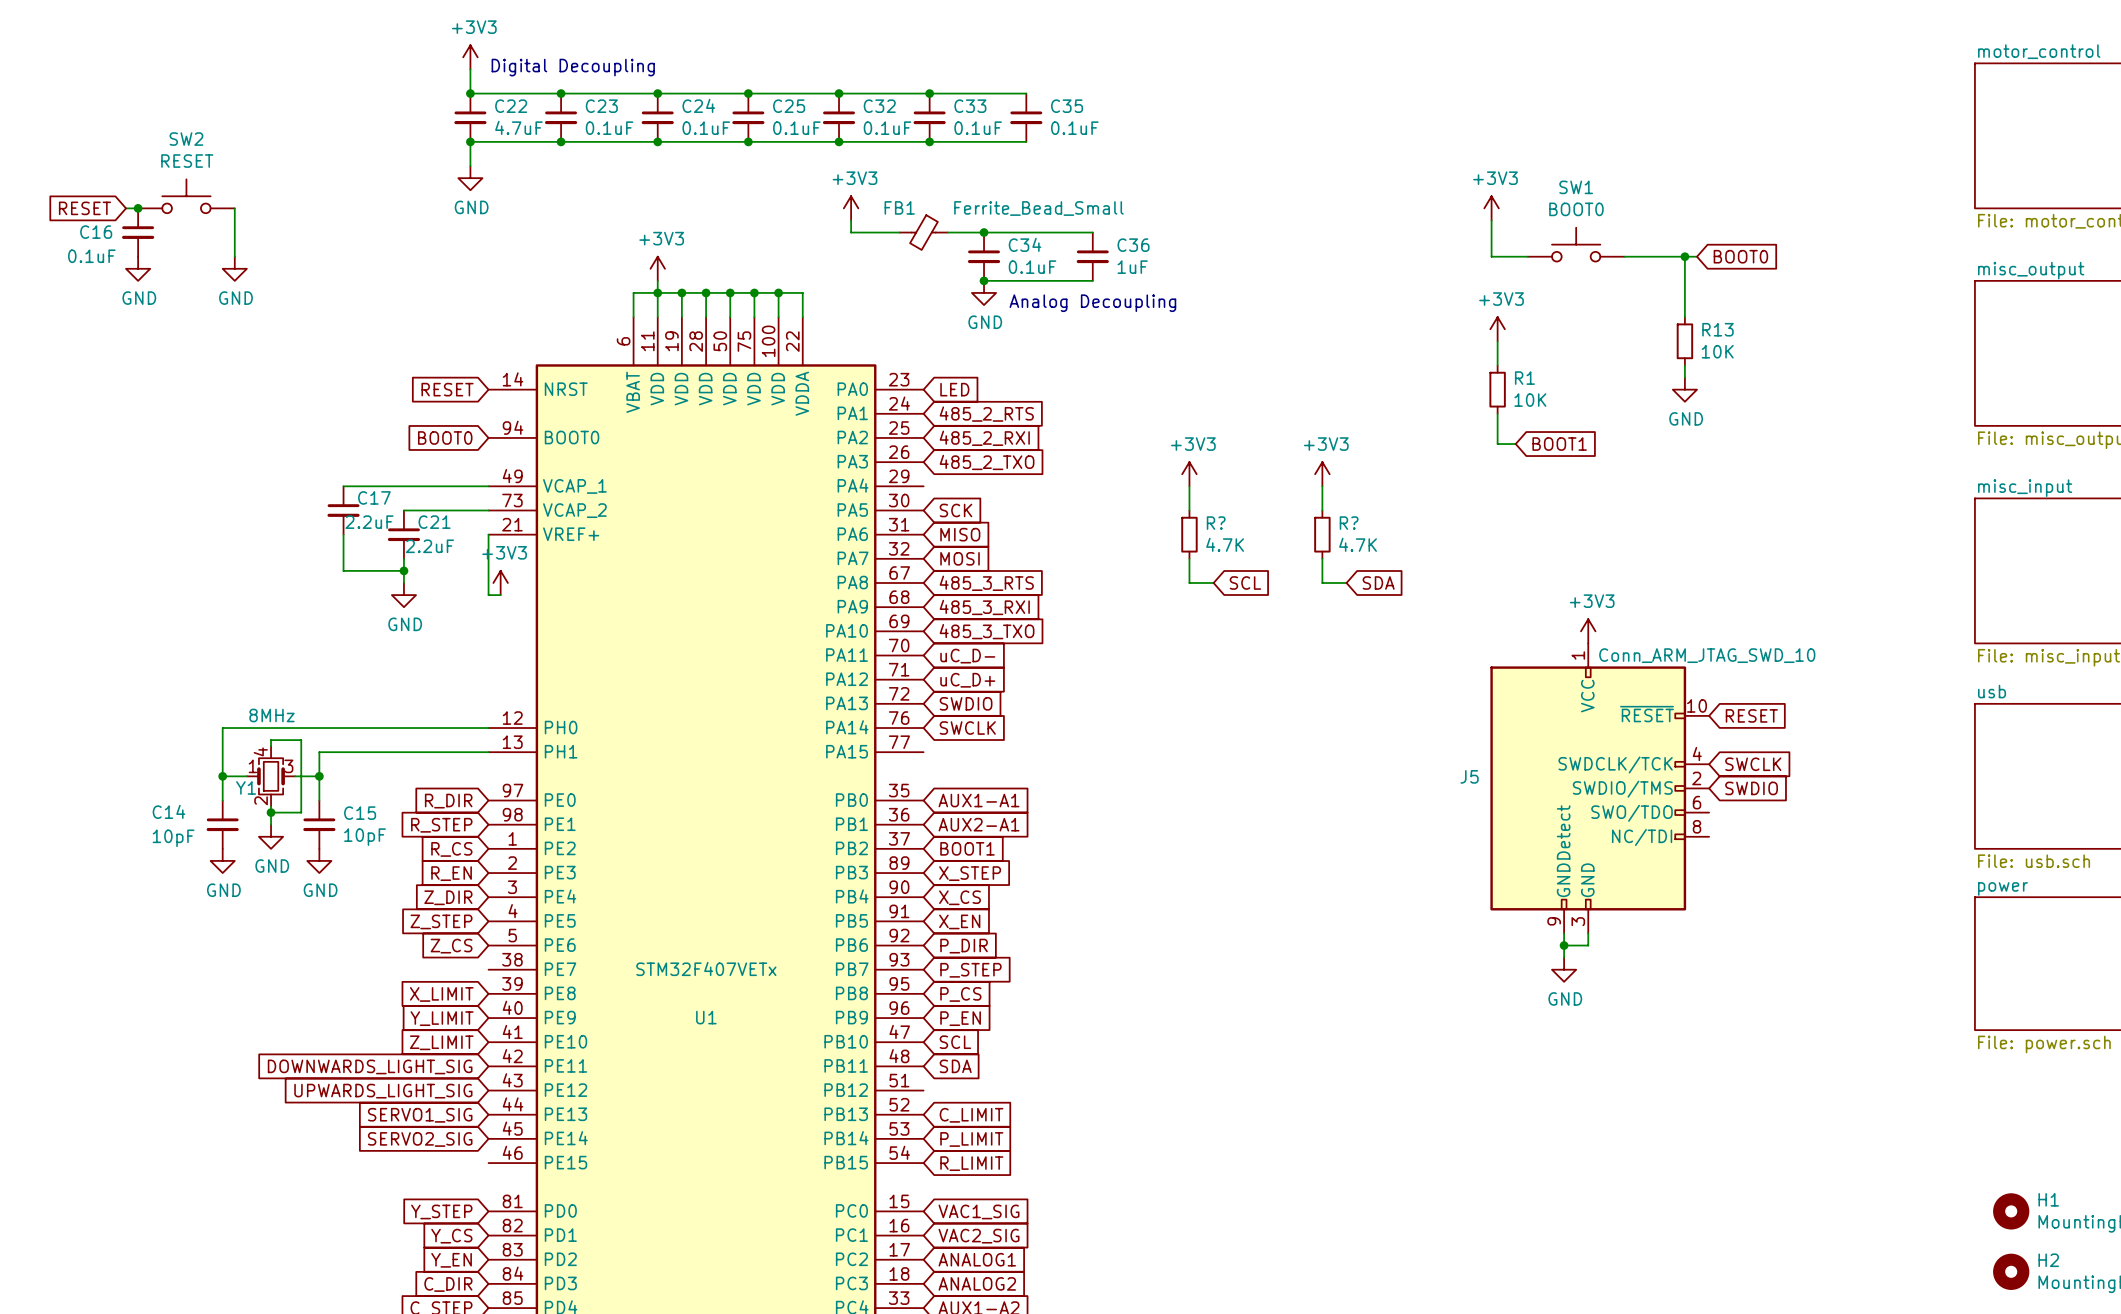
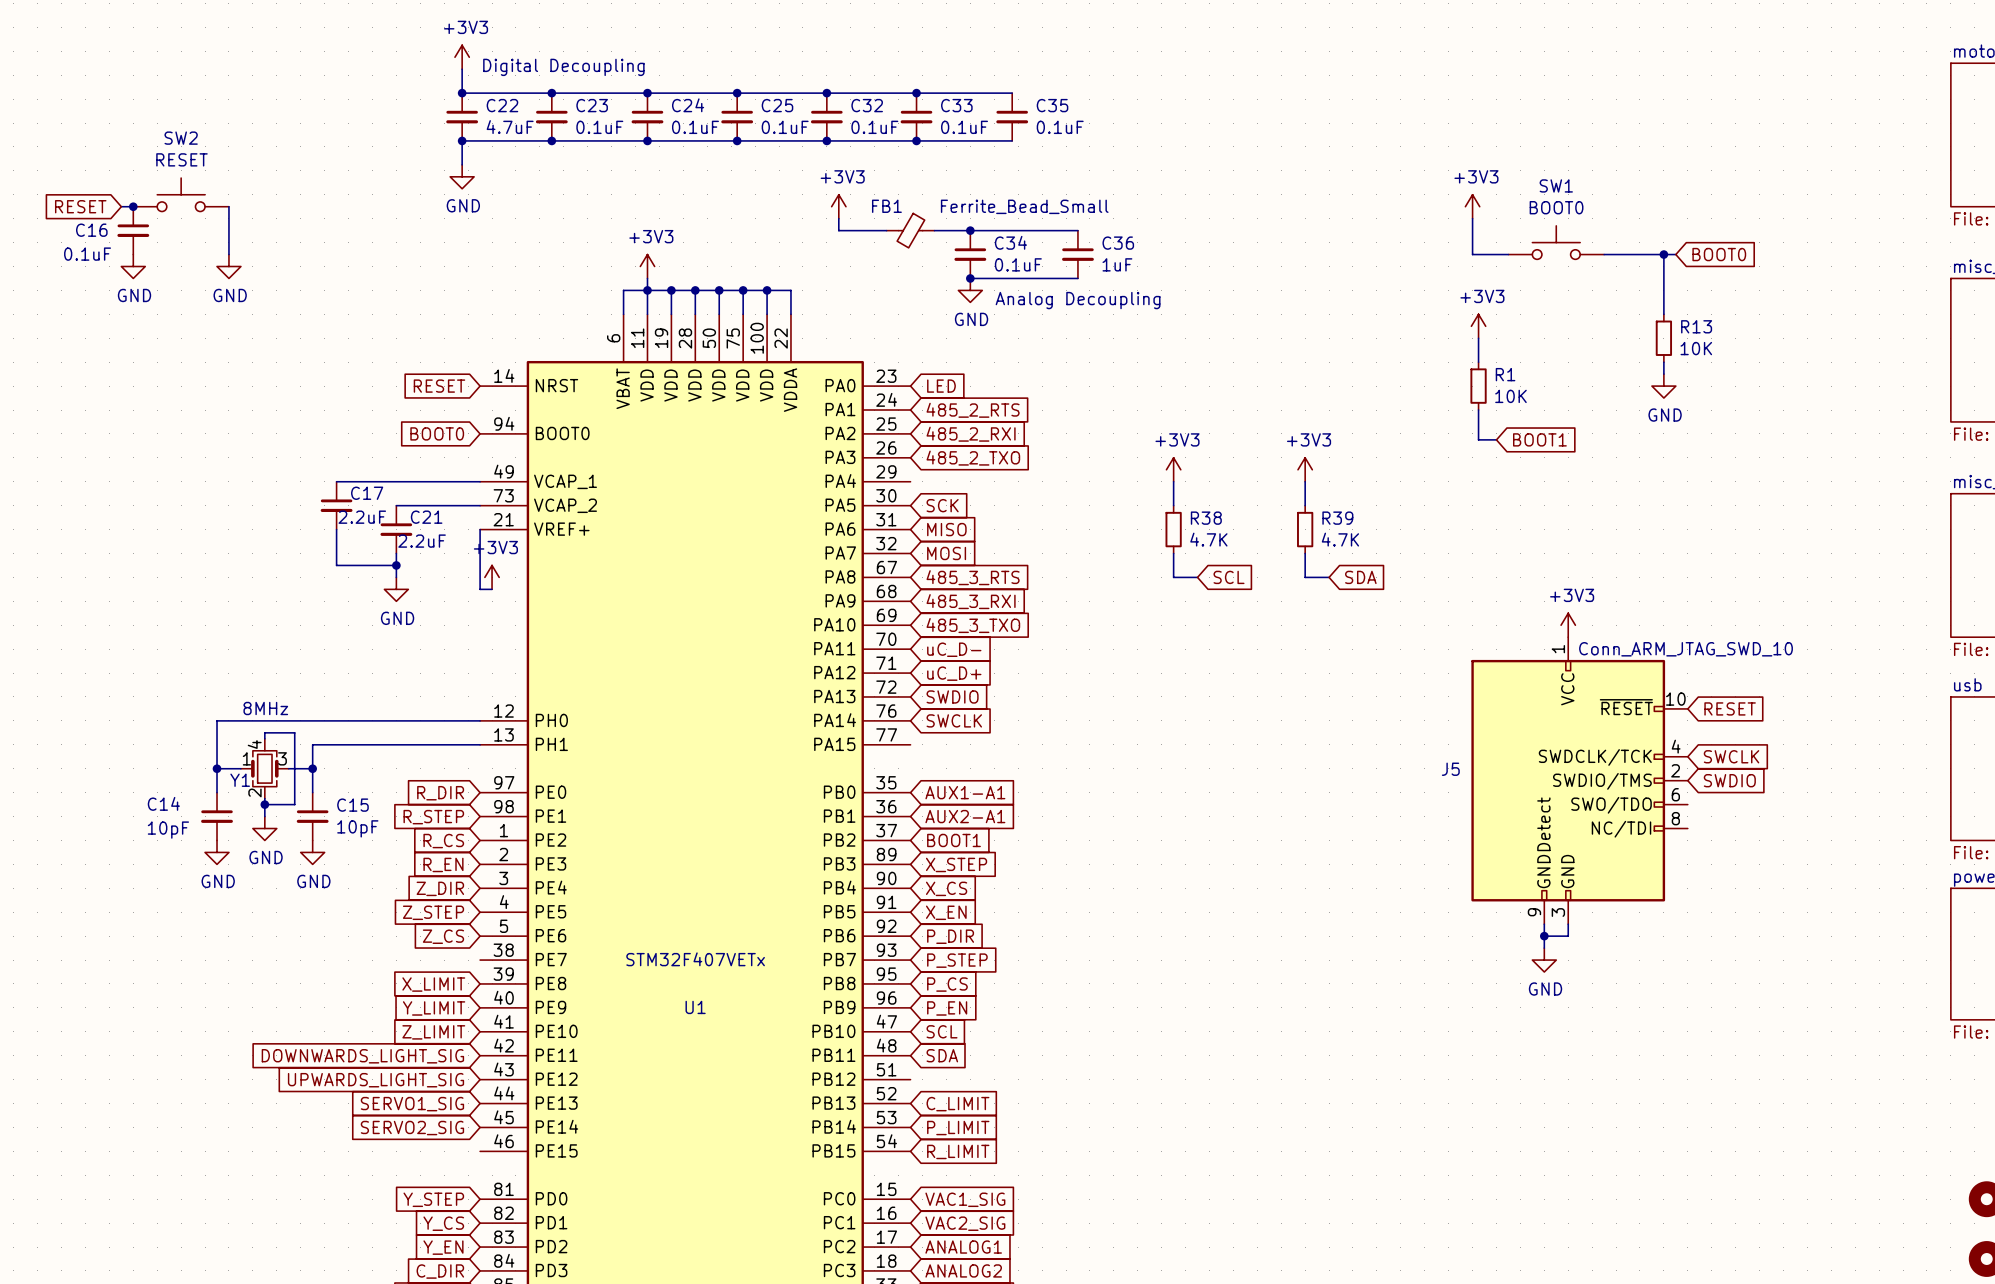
R? name: R? (1216, 523) -> R38 (1206, 518)
R? name: R? (1349, 523) -> R39 (1337, 518)

